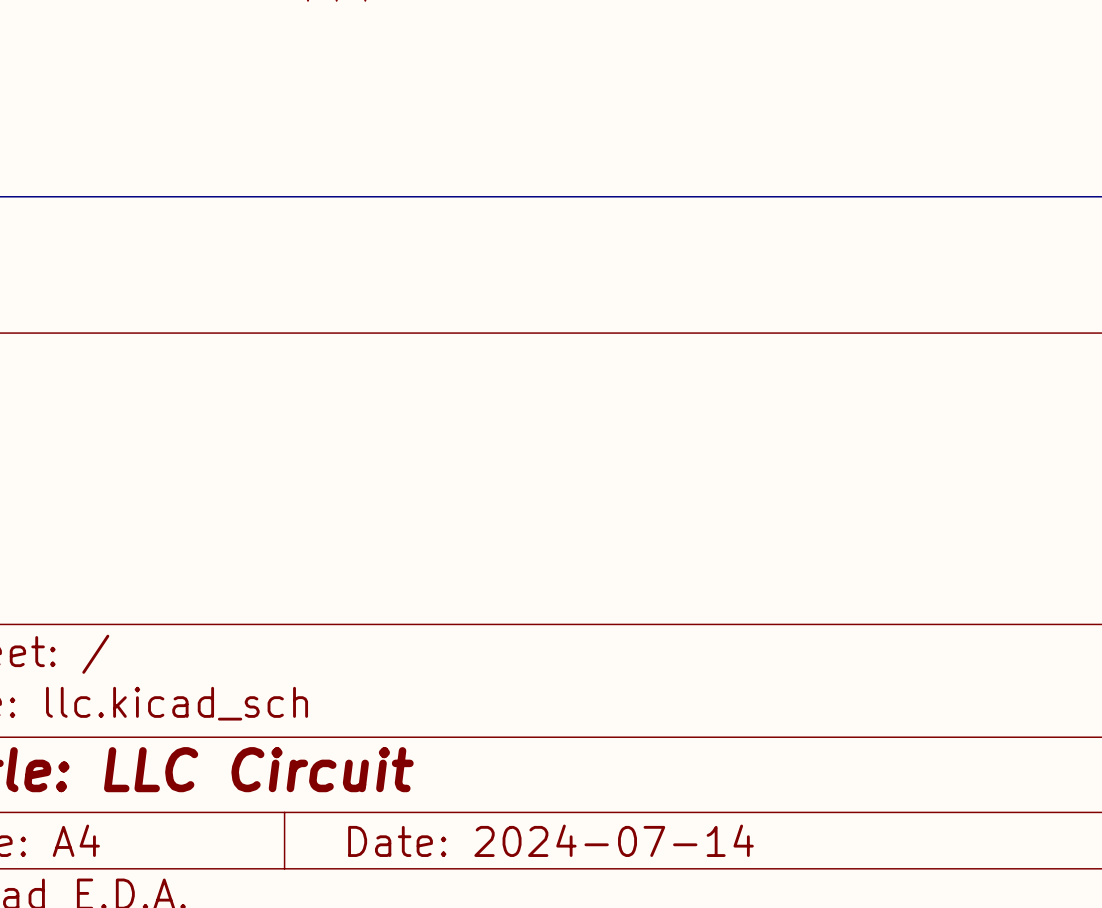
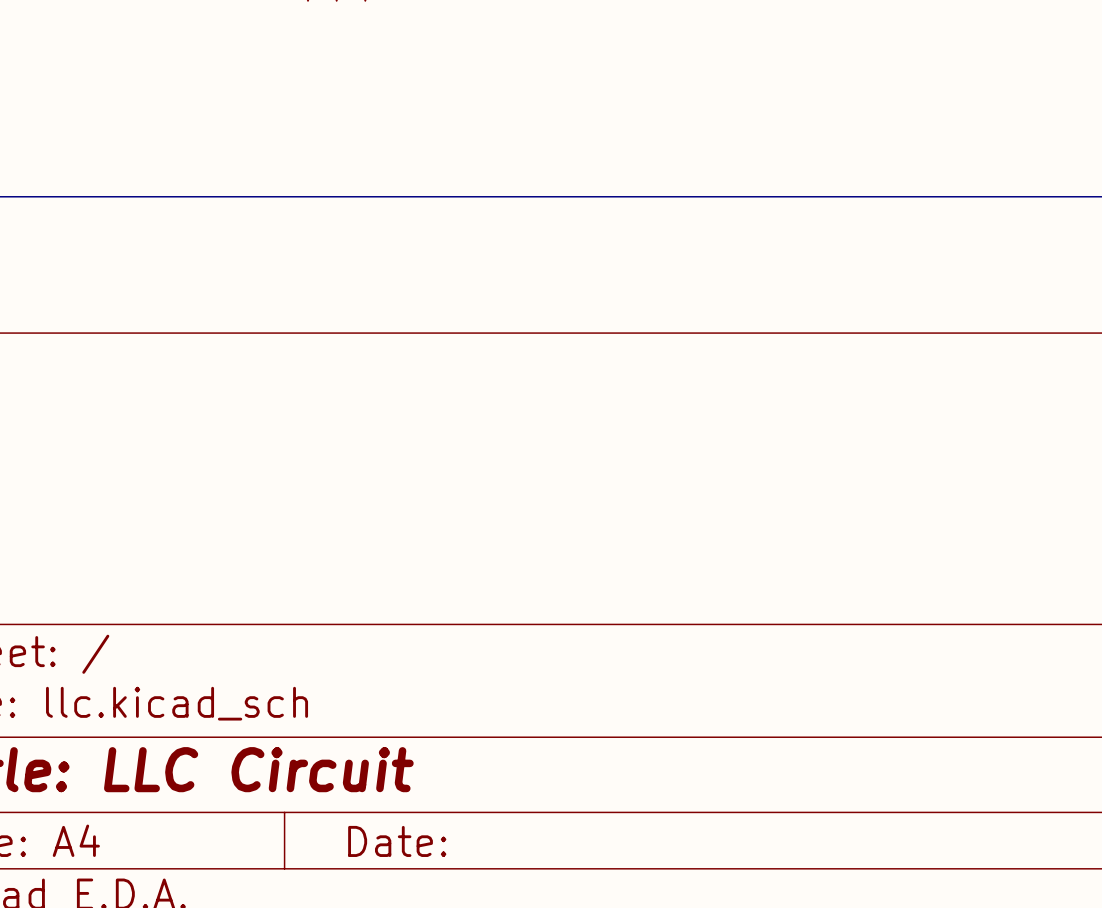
title block: Date: 2024-07-14 (550, 840) -> Date: (397, 841)

